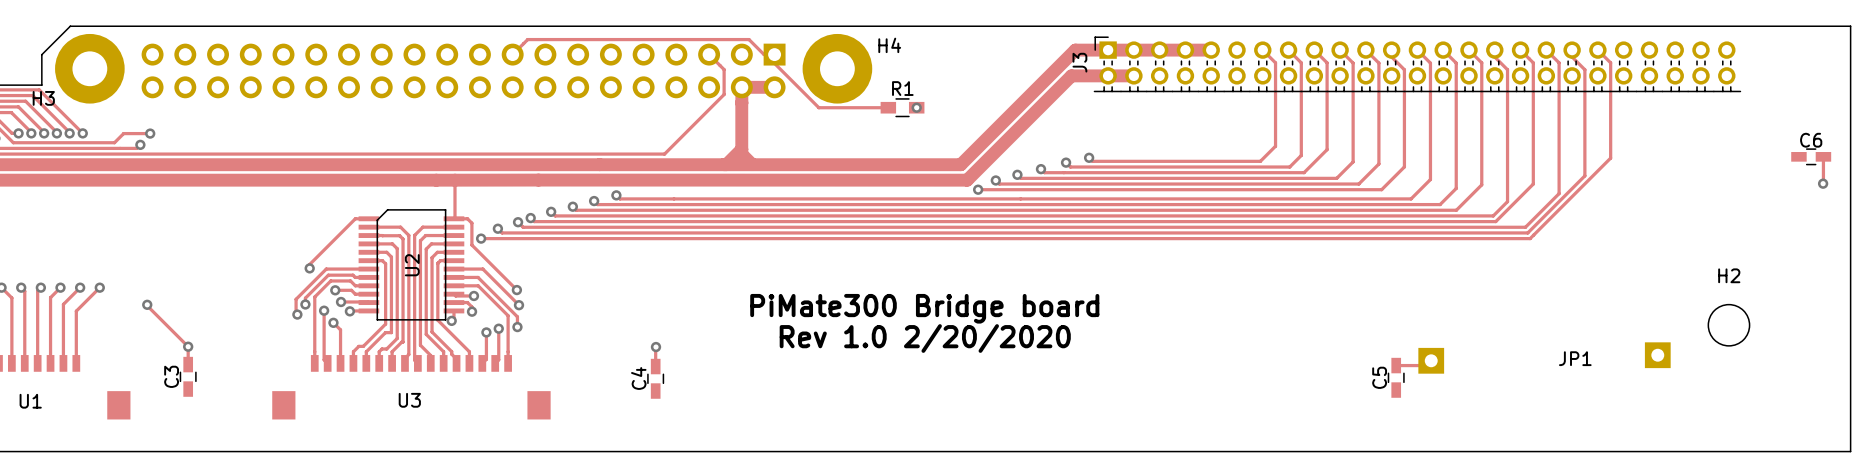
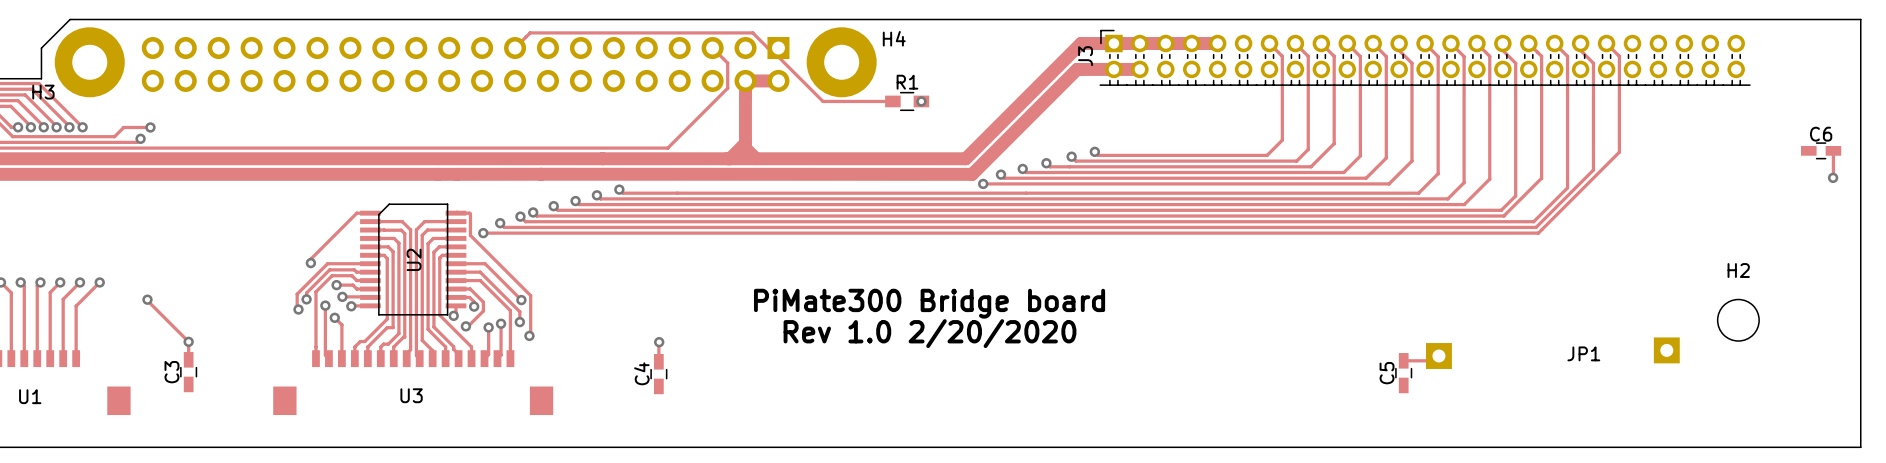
track: (454, 180) (454, 217) -> none
track: (468, 219) (471, 223) (471, 245) (516, 290) -> (470, 214) (470, 235) (530, 295) (529, 335)
via: (516, 290) -> none
track: (453, 294) (455, 295) (473, 295) -> (456, 289) (470, 289) (483, 302) (483, 311) (465, 326)
via: (473, 295) -> none
via: none -> (465, 326)
via: none -> (529, 335)

